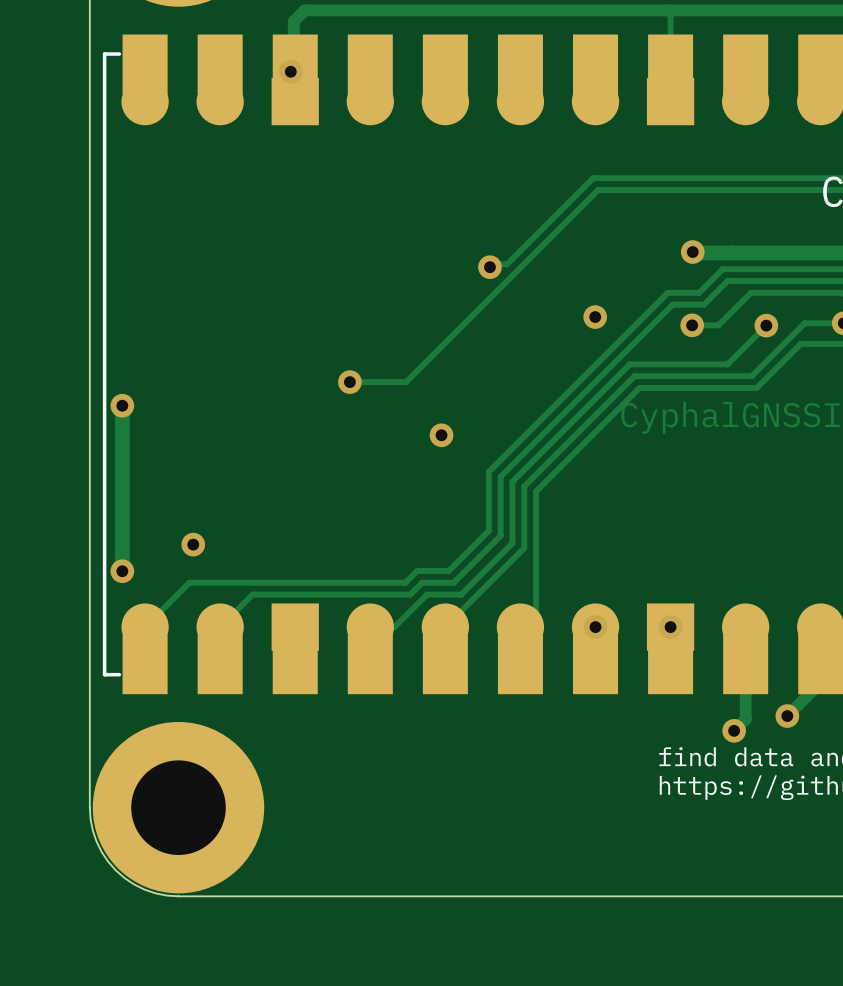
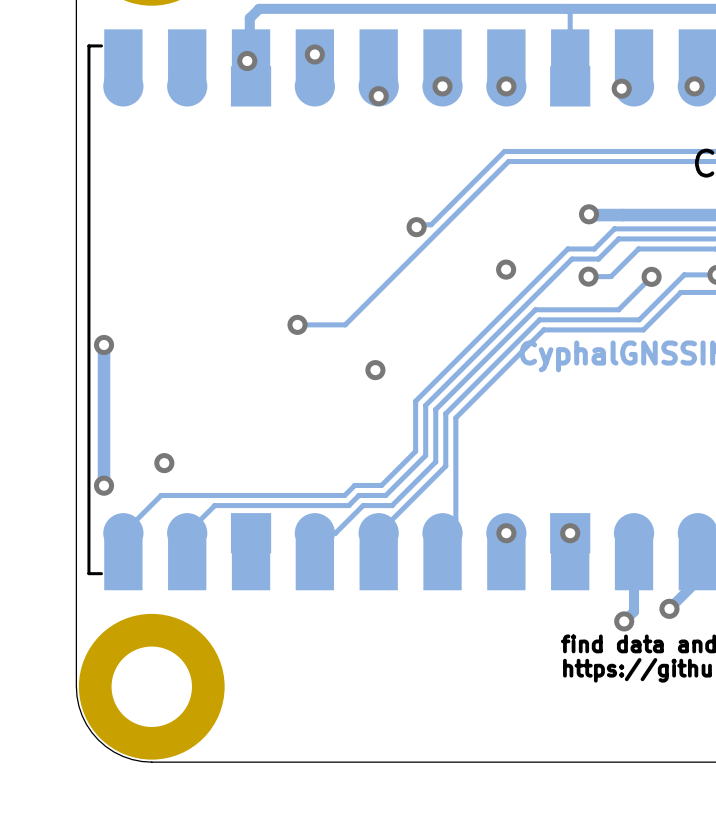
via: none -> (314, 54)
via: none -> (442, 86)
via: none -> (506, 86)
via: none -> (694, 86)
via: none -> (621, 88)
via: none -> (378, 96)

